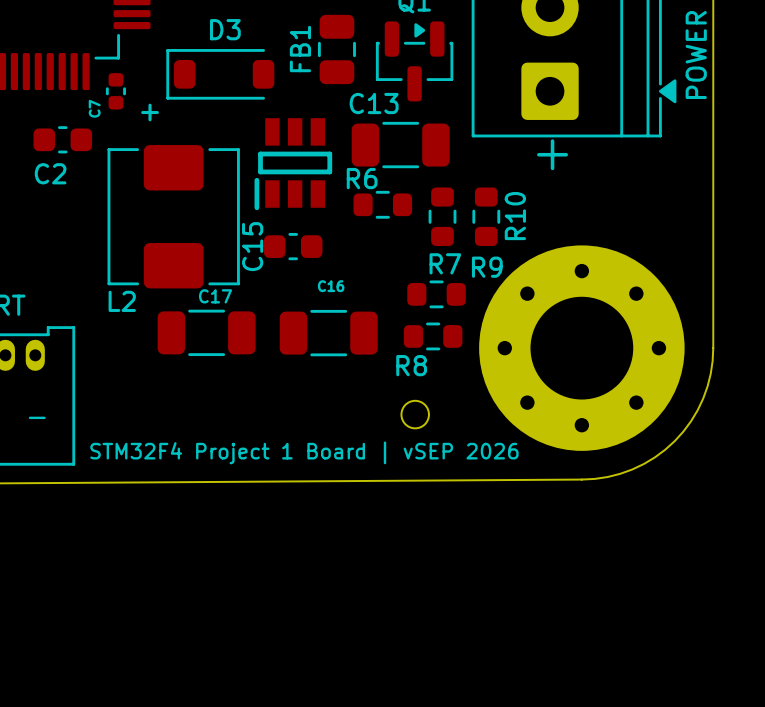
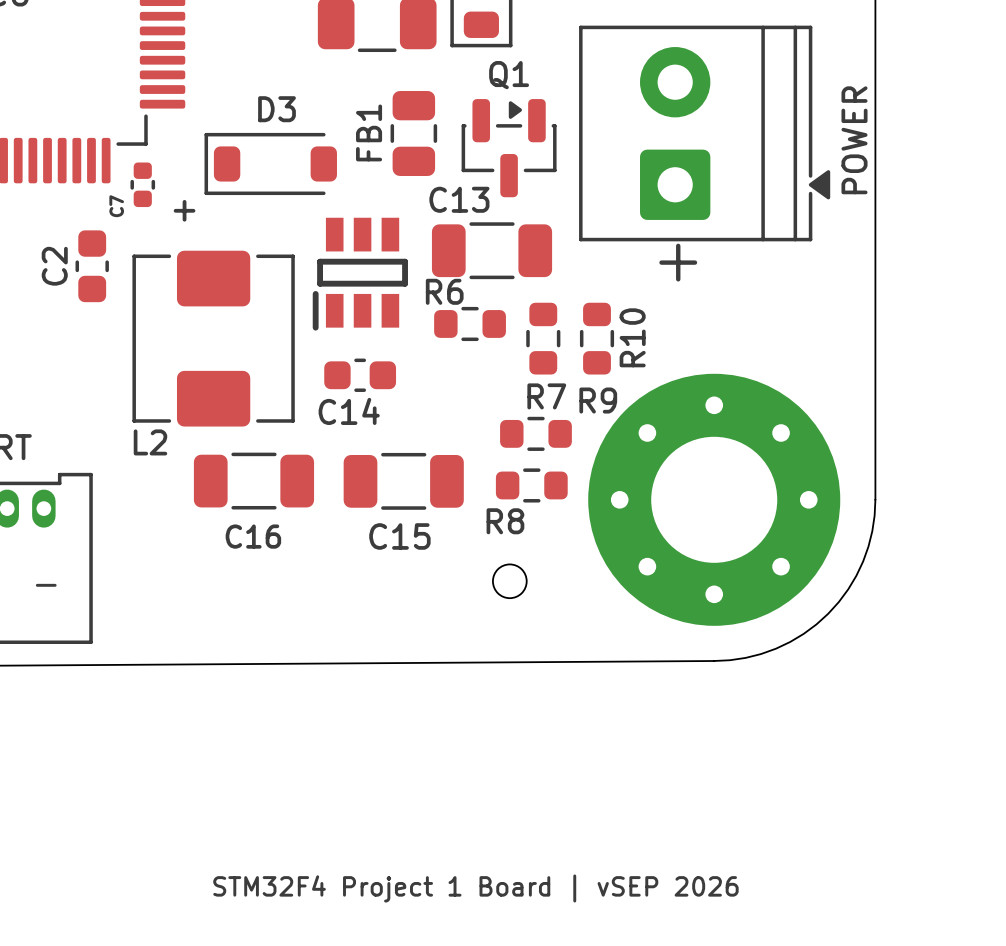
C2 rotation: 0° (62, 139) -> 90° clockwise (92, 266)
C15 name: C15 (252, 246) -> C14 (349, 411)
C16 name: C16 (331, 286) -> C15 (399, 536)
C17 name: C17 (215, 296) -> C16 (253, 536)
text position: STM32F4 Project 1 Board | vSEP 2026 (304, 452) -> STM32F4 Project 1 Board | vSEP 2026 (475, 888)

